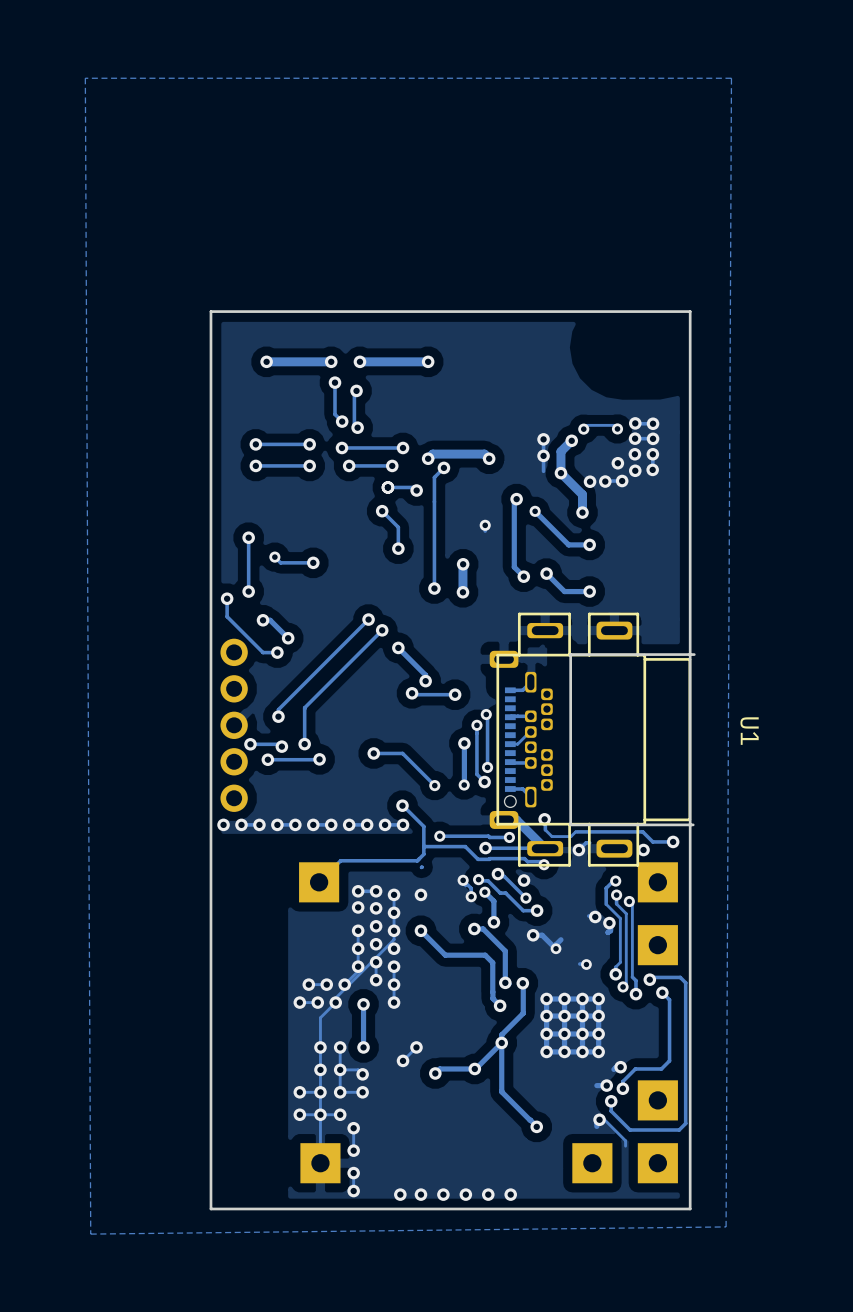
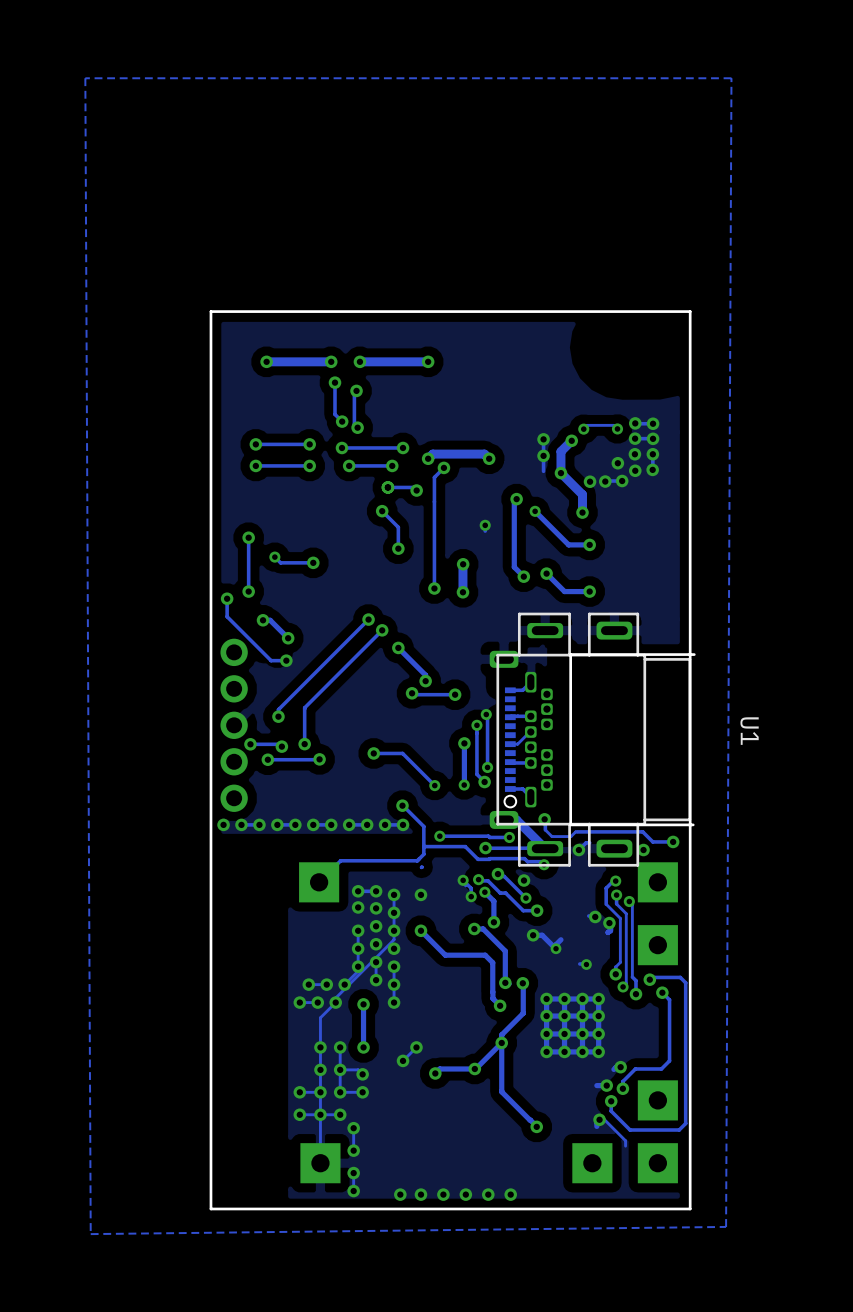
track: (277, 652) (263, 652) -> (286, 660) (271, 660) (263, 652)
via position: (277, 652) -> (286, 660)

